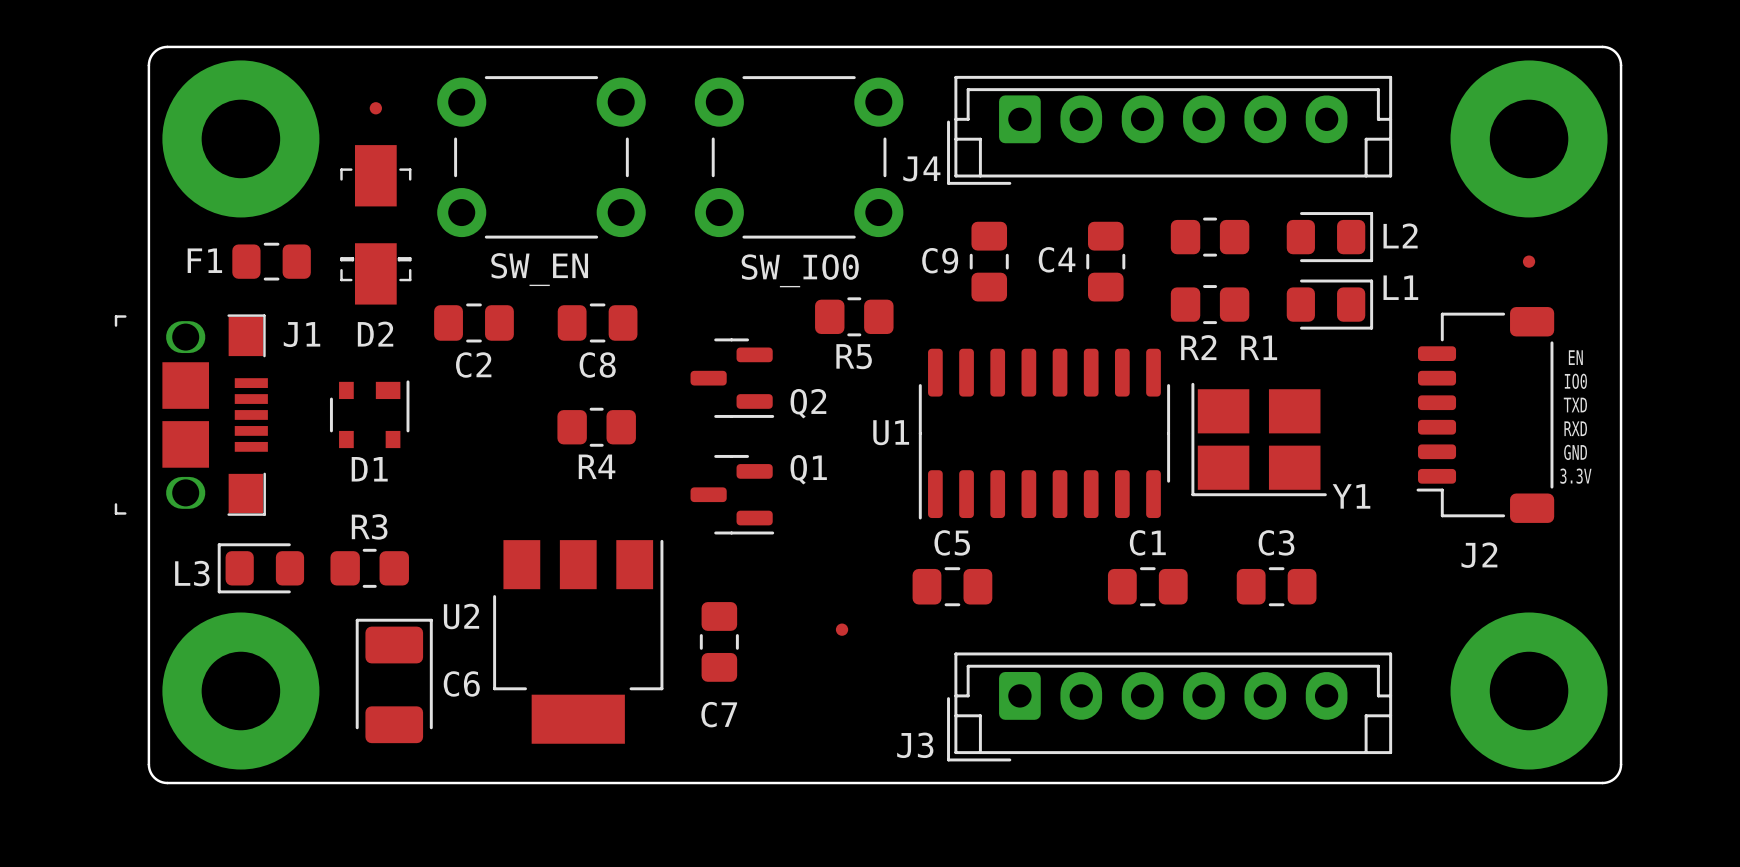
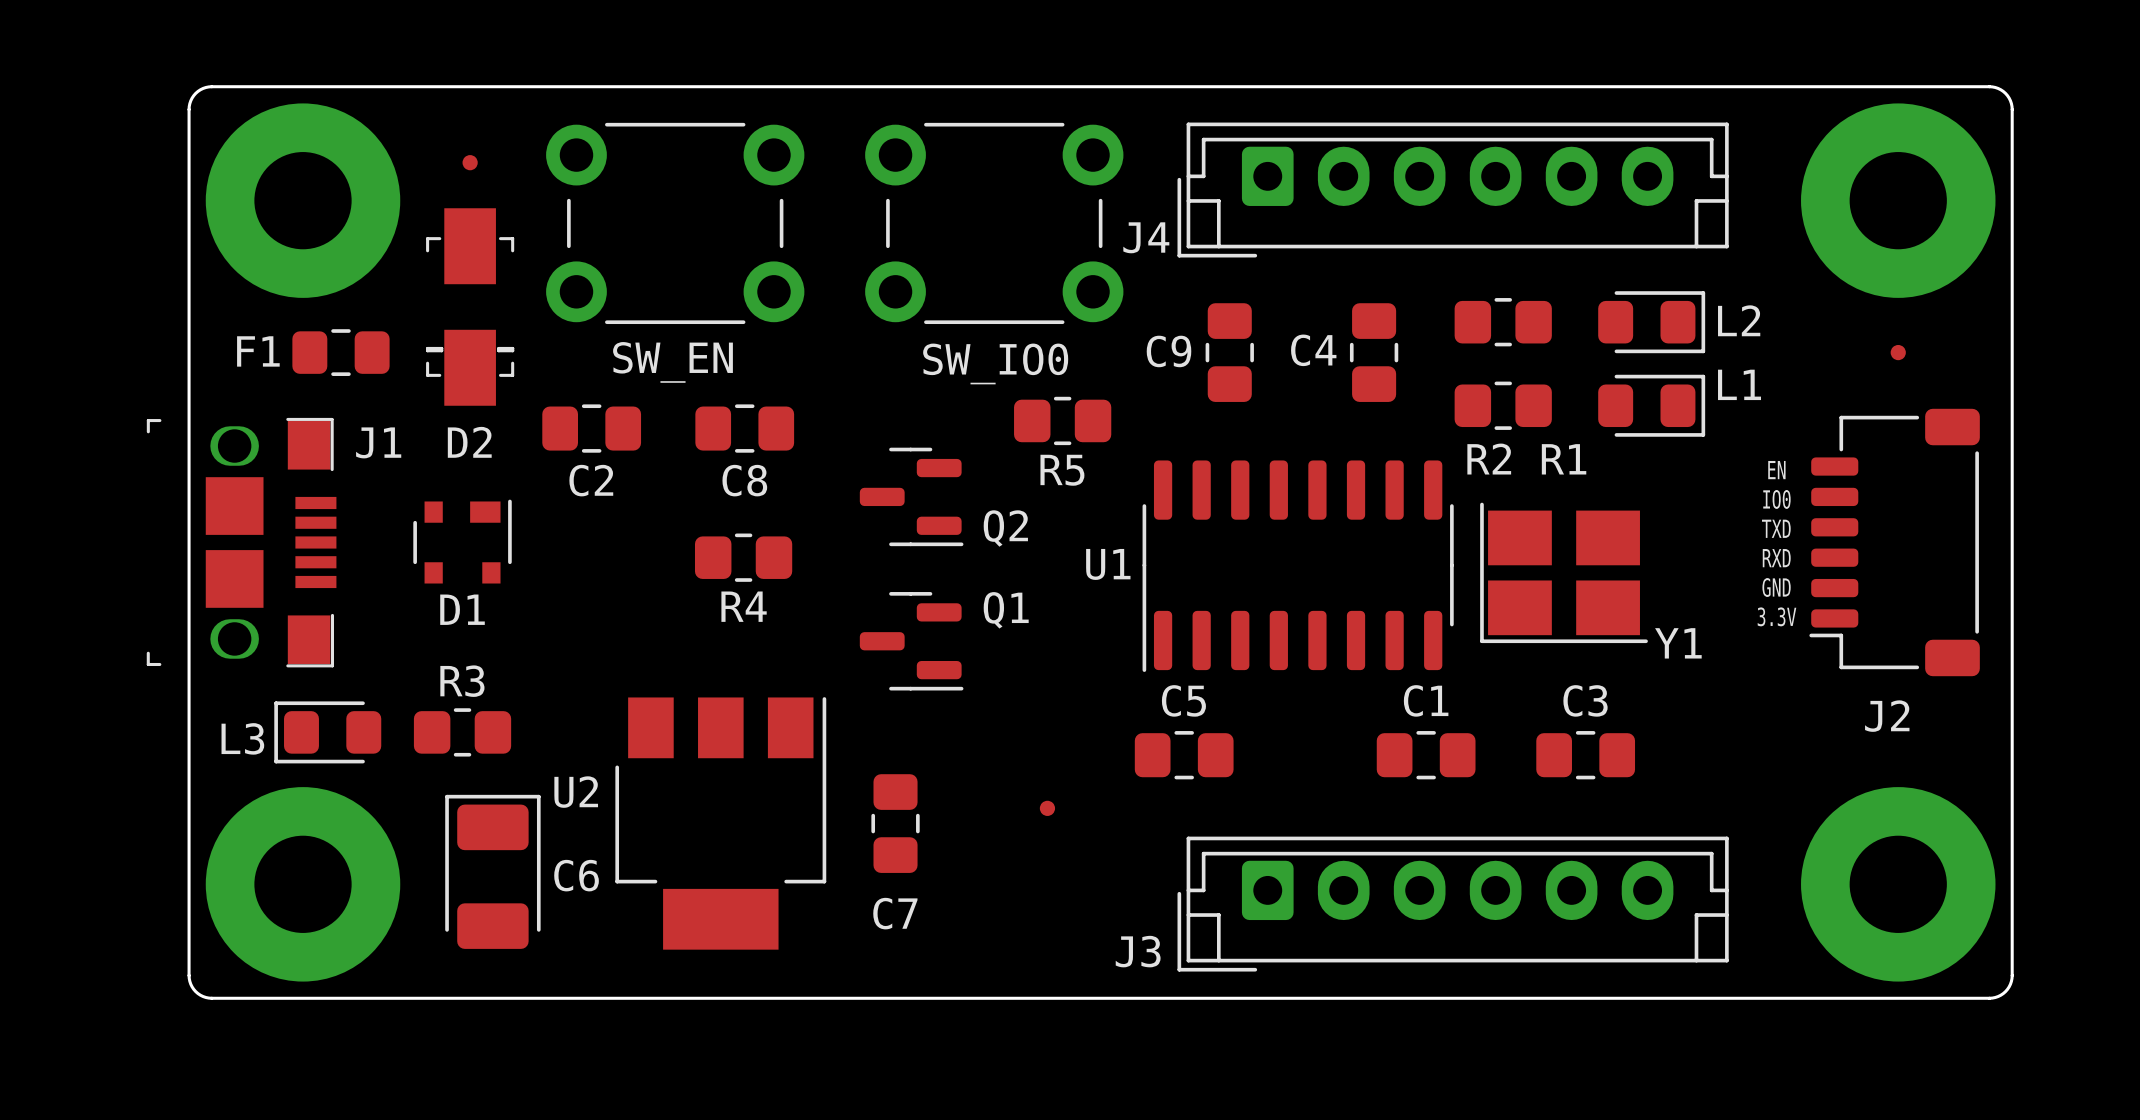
text position: EN (1575, 357) -> EN (1776, 470)
text position: IO0 (1575, 381) -> IO0 (1776, 499)
text position: TXD (1575, 405) -> TXD (1776, 528)
J2 position: (1485, 414) -> (1894, 542)
text position: RXD (1575, 428) -> RXD (1776, 558)
text position: GND (1575, 452) -> GND (1776, 587)
text position: 3.3V (1575, 476) -> 3.3V (1776, 616)

